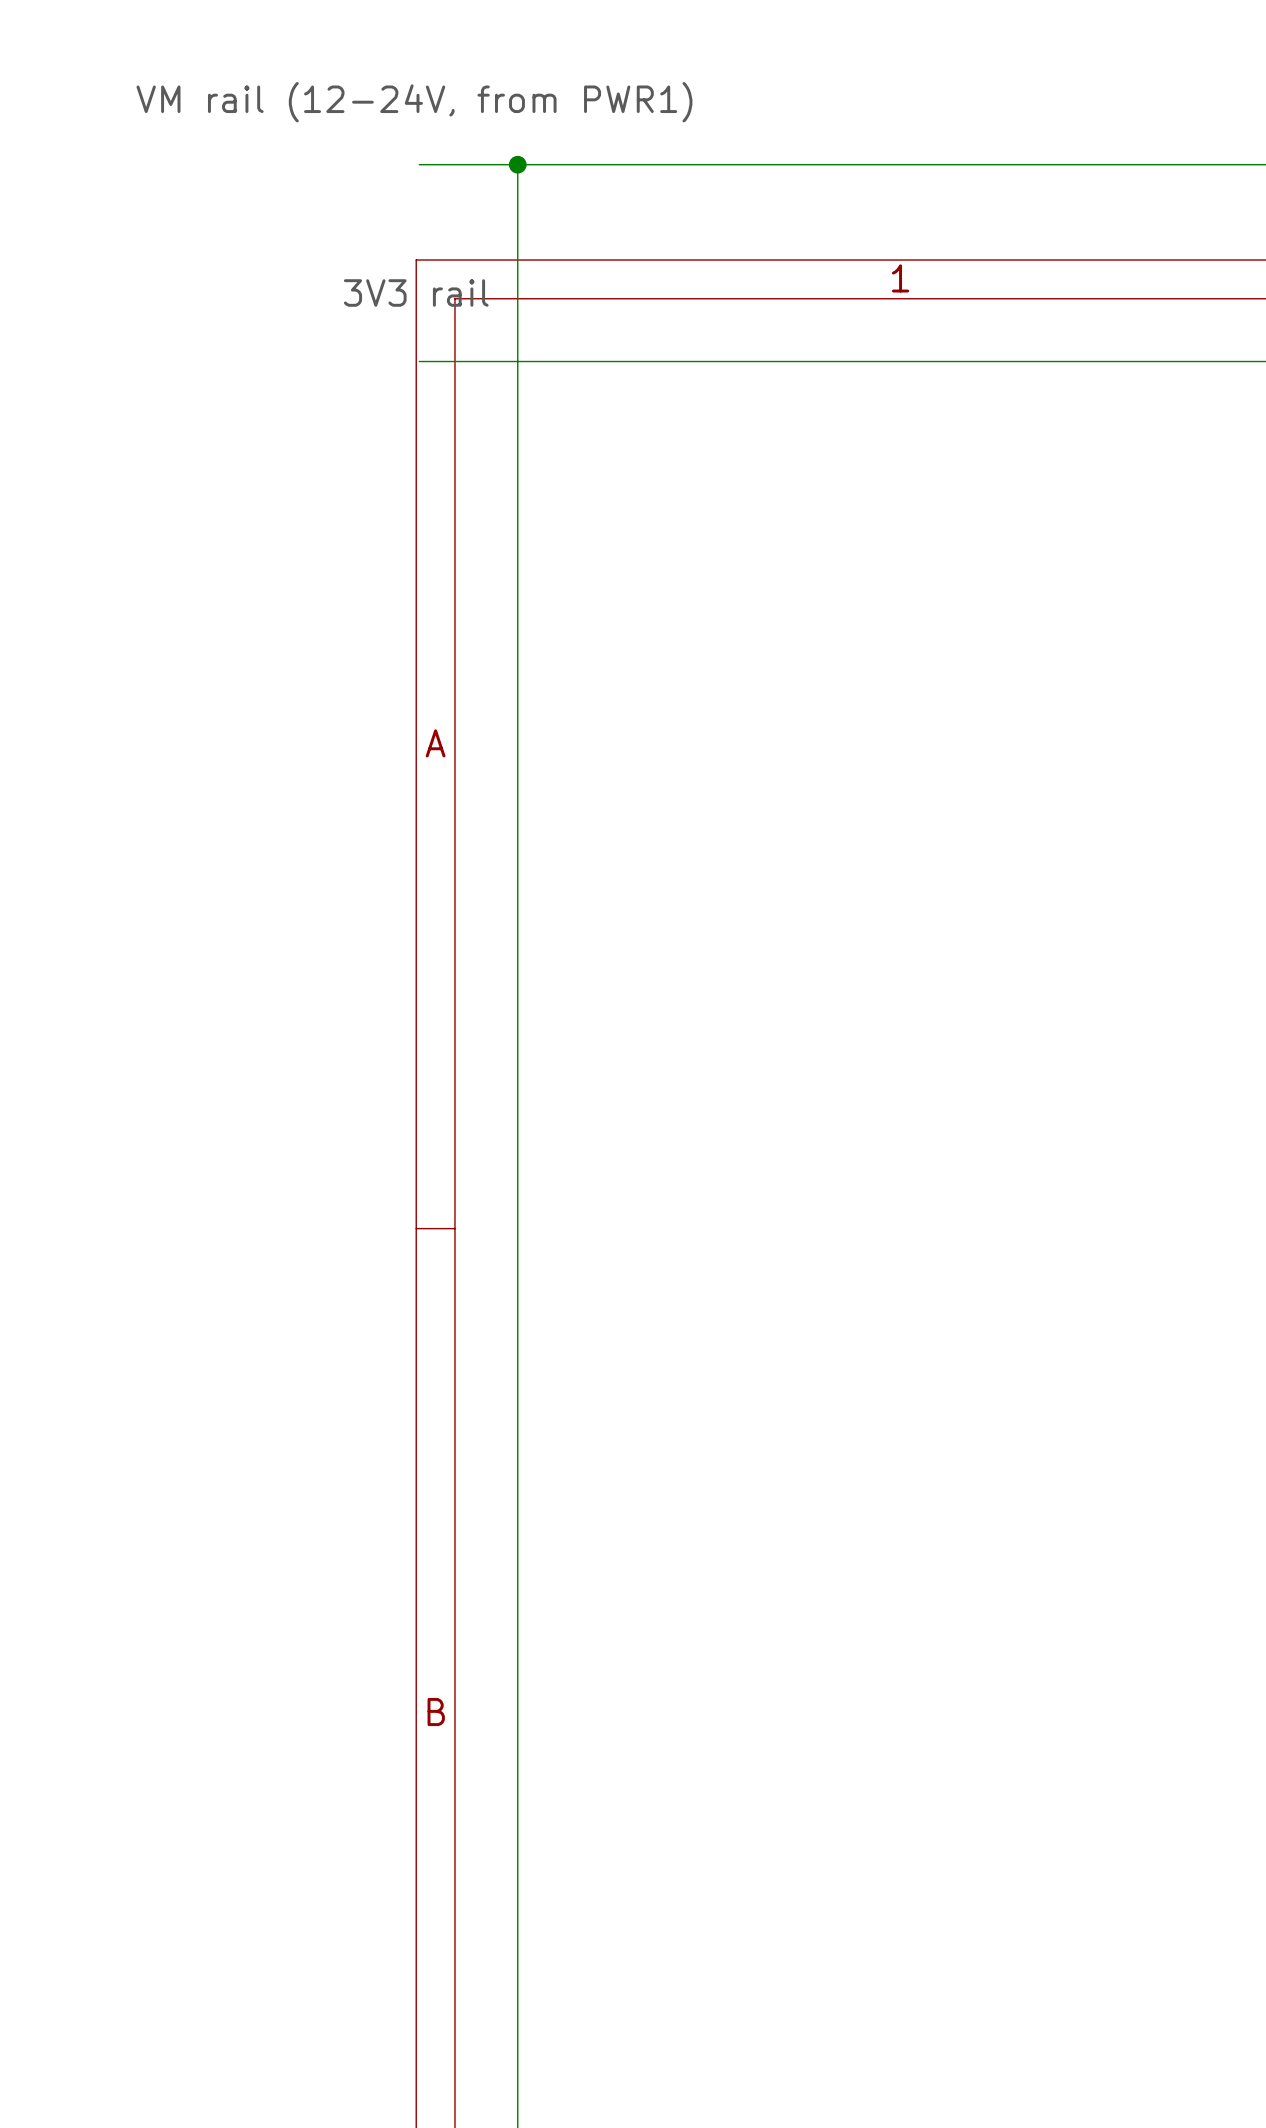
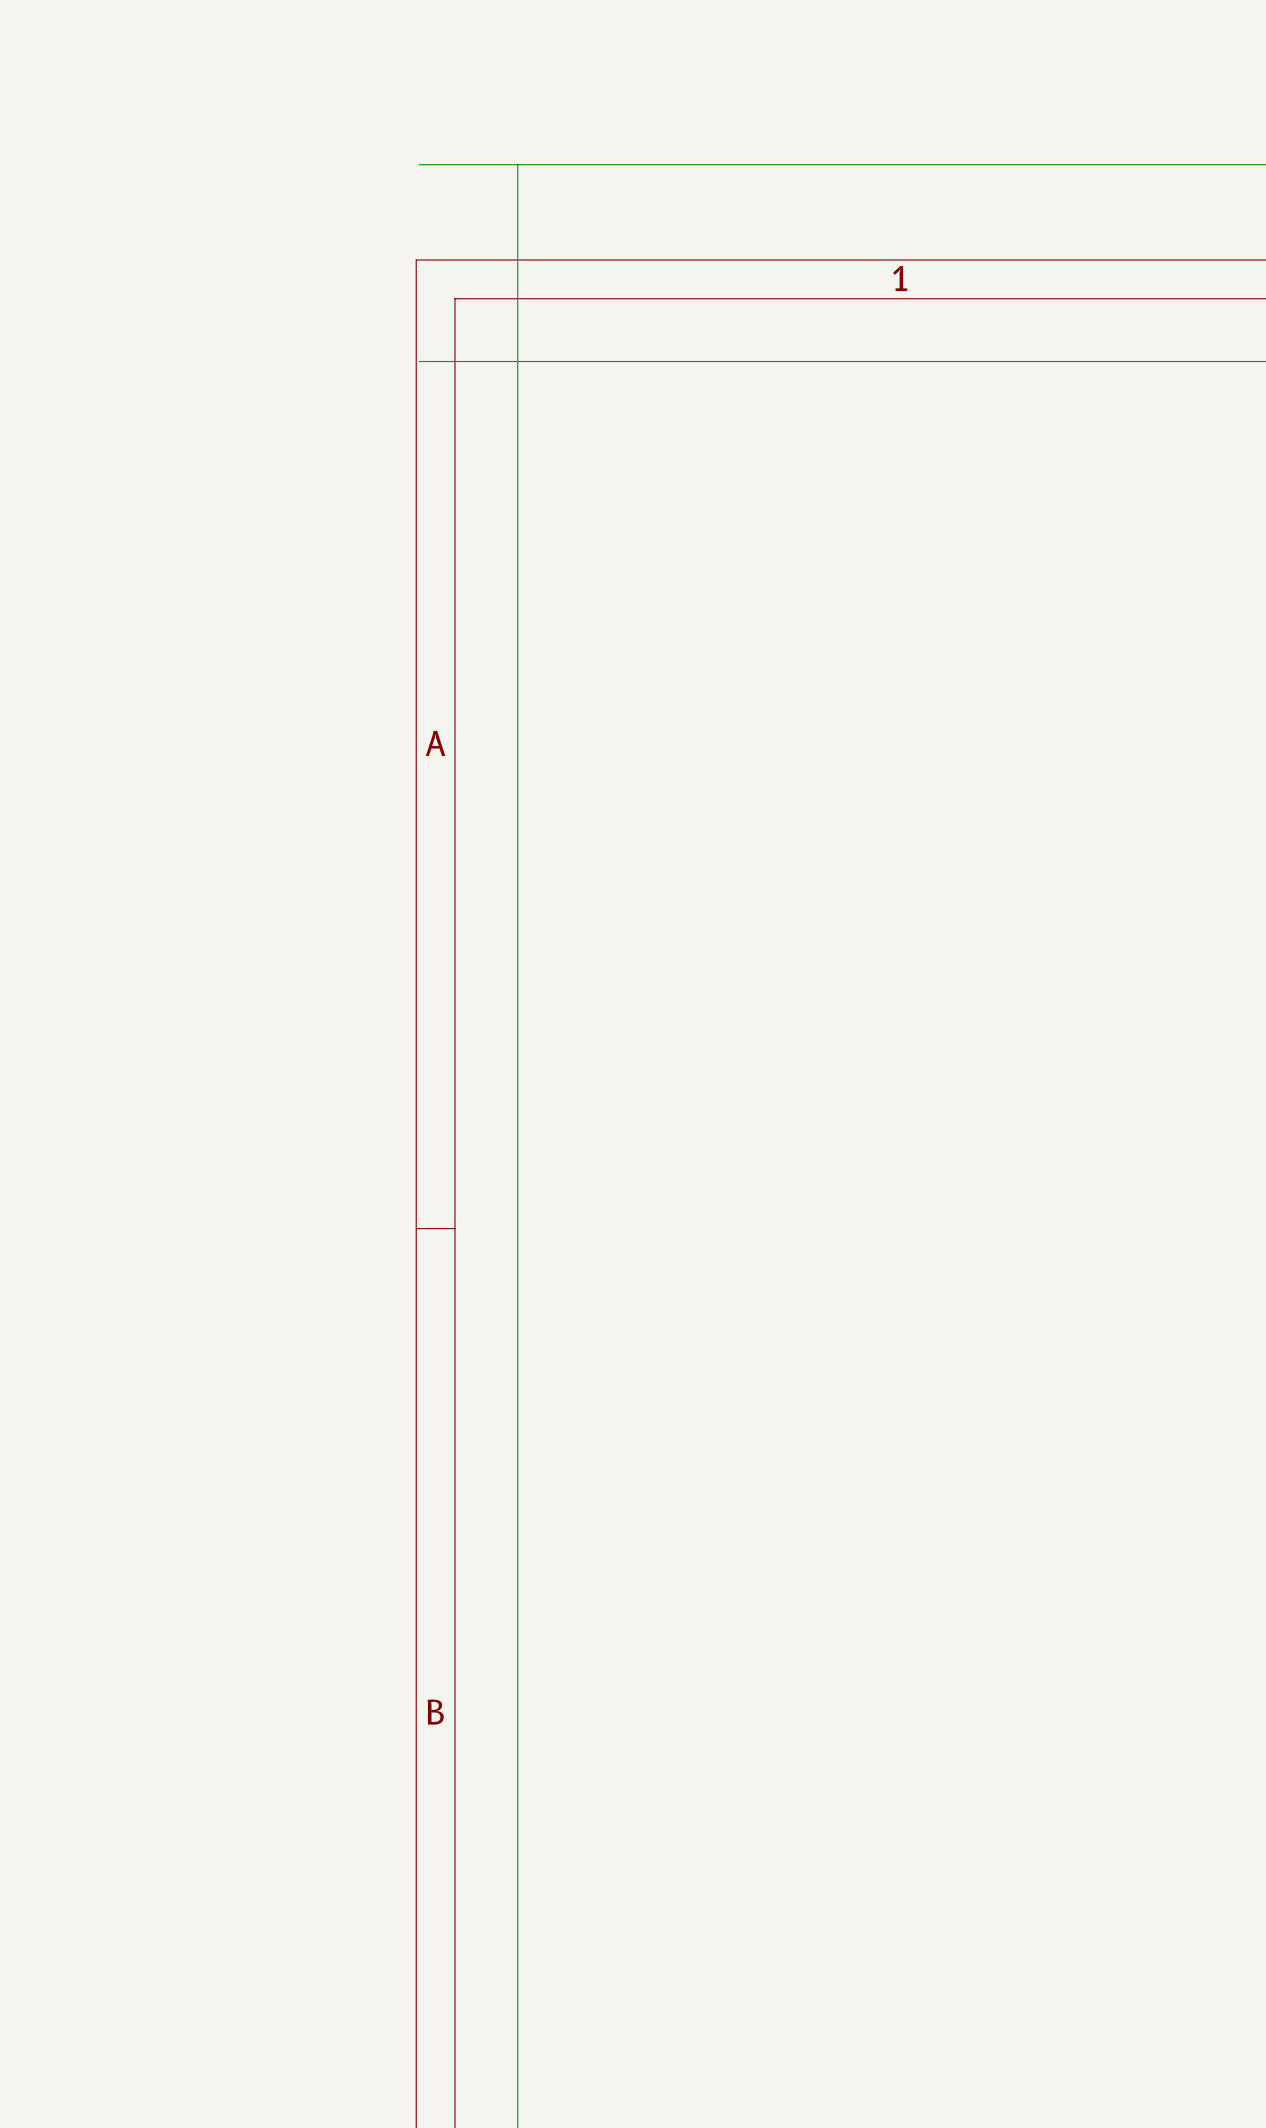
text: VM rail (12-24V, from PWR1) (414, 102) -> none
junction: (517, 164) -> none
text: 3V3 rail (416, 292) -> none

